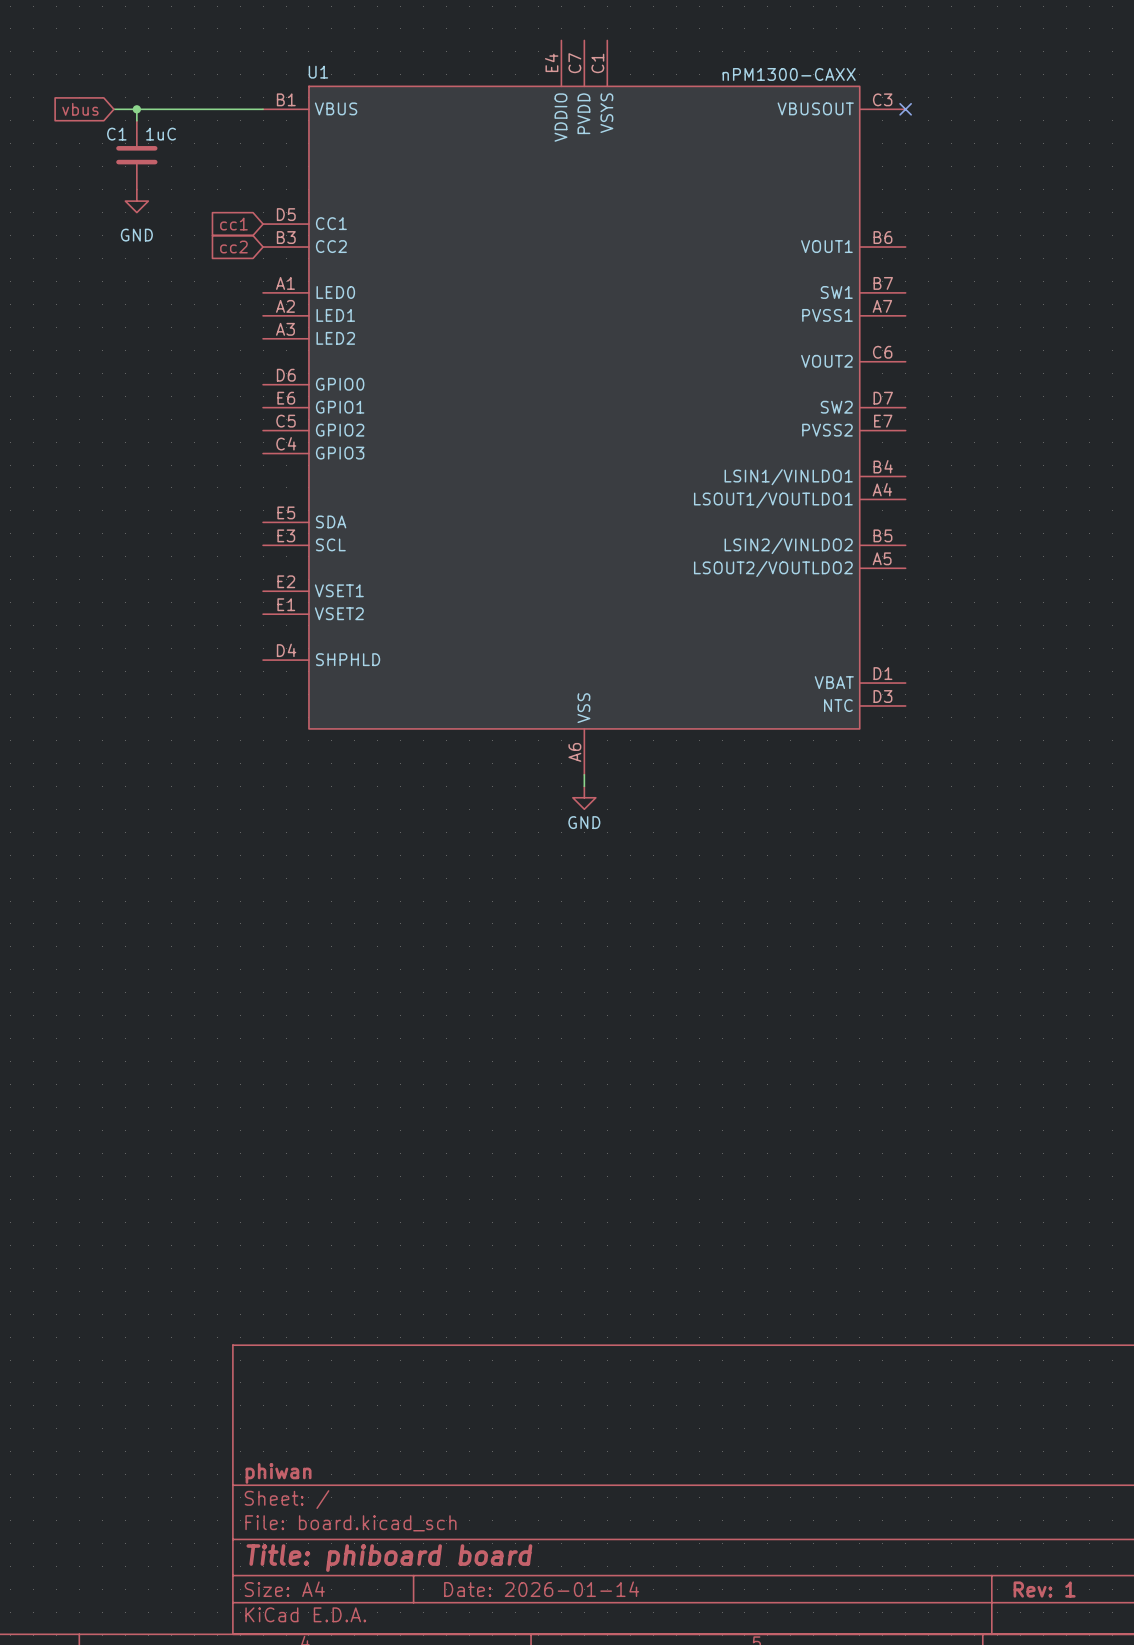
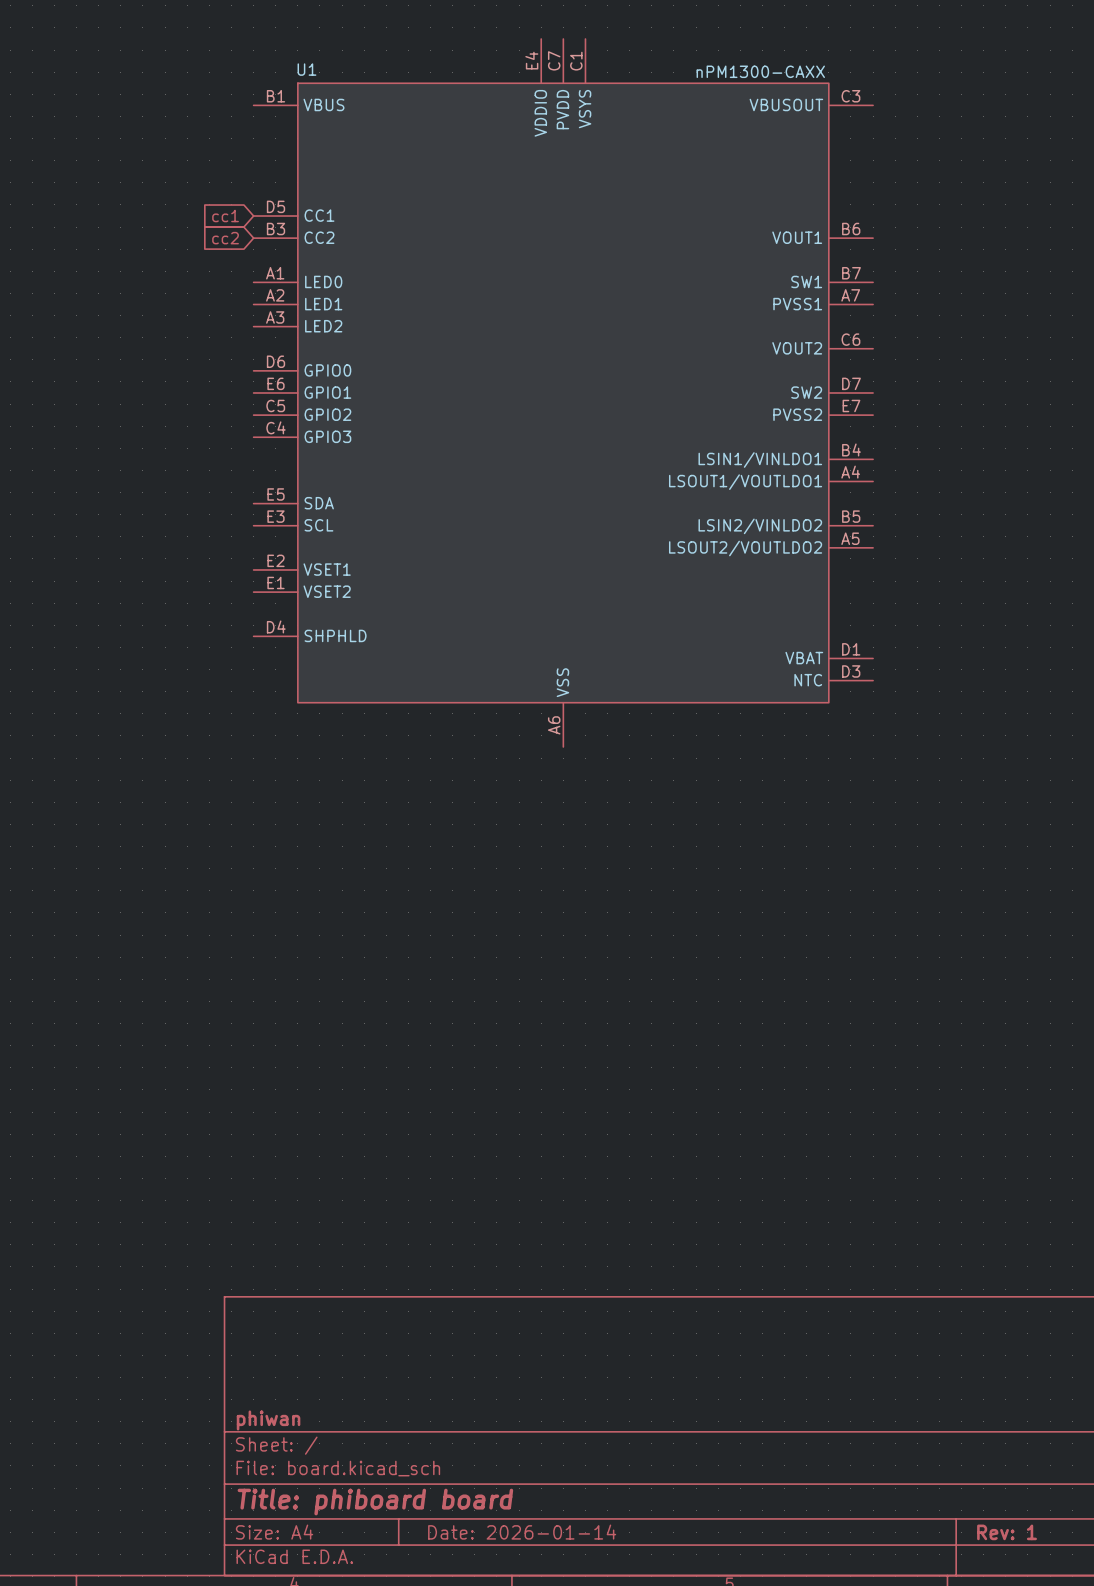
global label: vbus (80, 109) -> none
wire: (113, 109) (263, 109) -> none
wire: (136, 109) (136, 120) -> none
junction: (136, 109) -> none
no-connect mark: (905, 109) -> none
C1: 1uC (136, 155) -> none
power symbol: GND (136, 201) -> none
wire: (584, 774) (584, 786) -> none
power symbol: GND (584, 797) -> none

